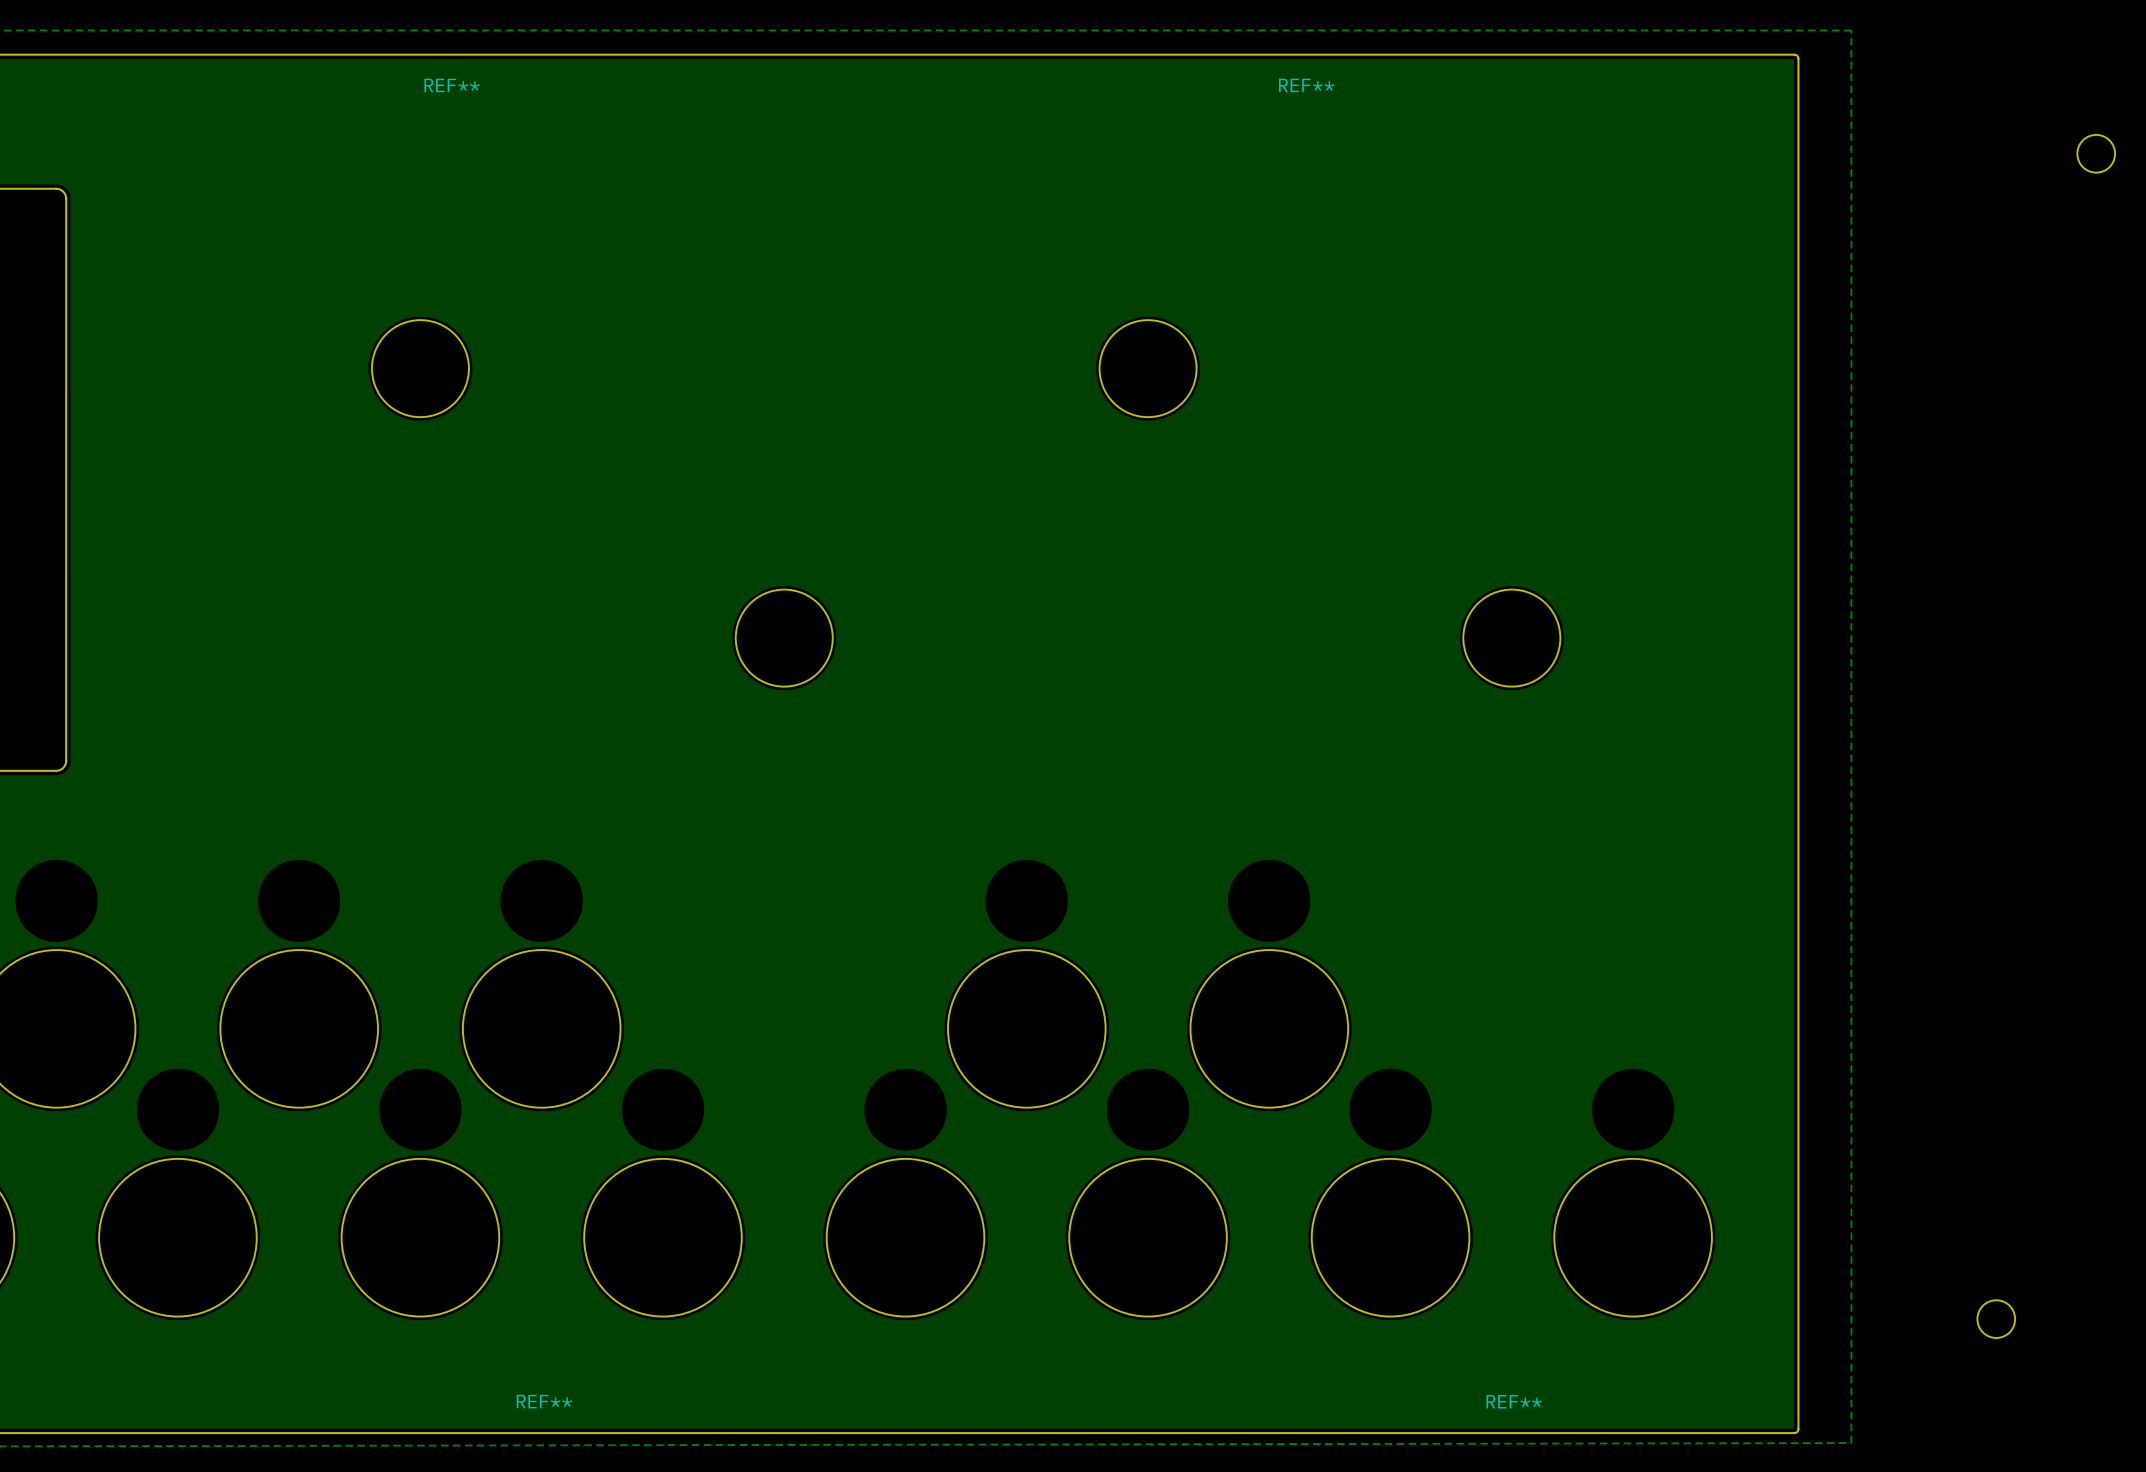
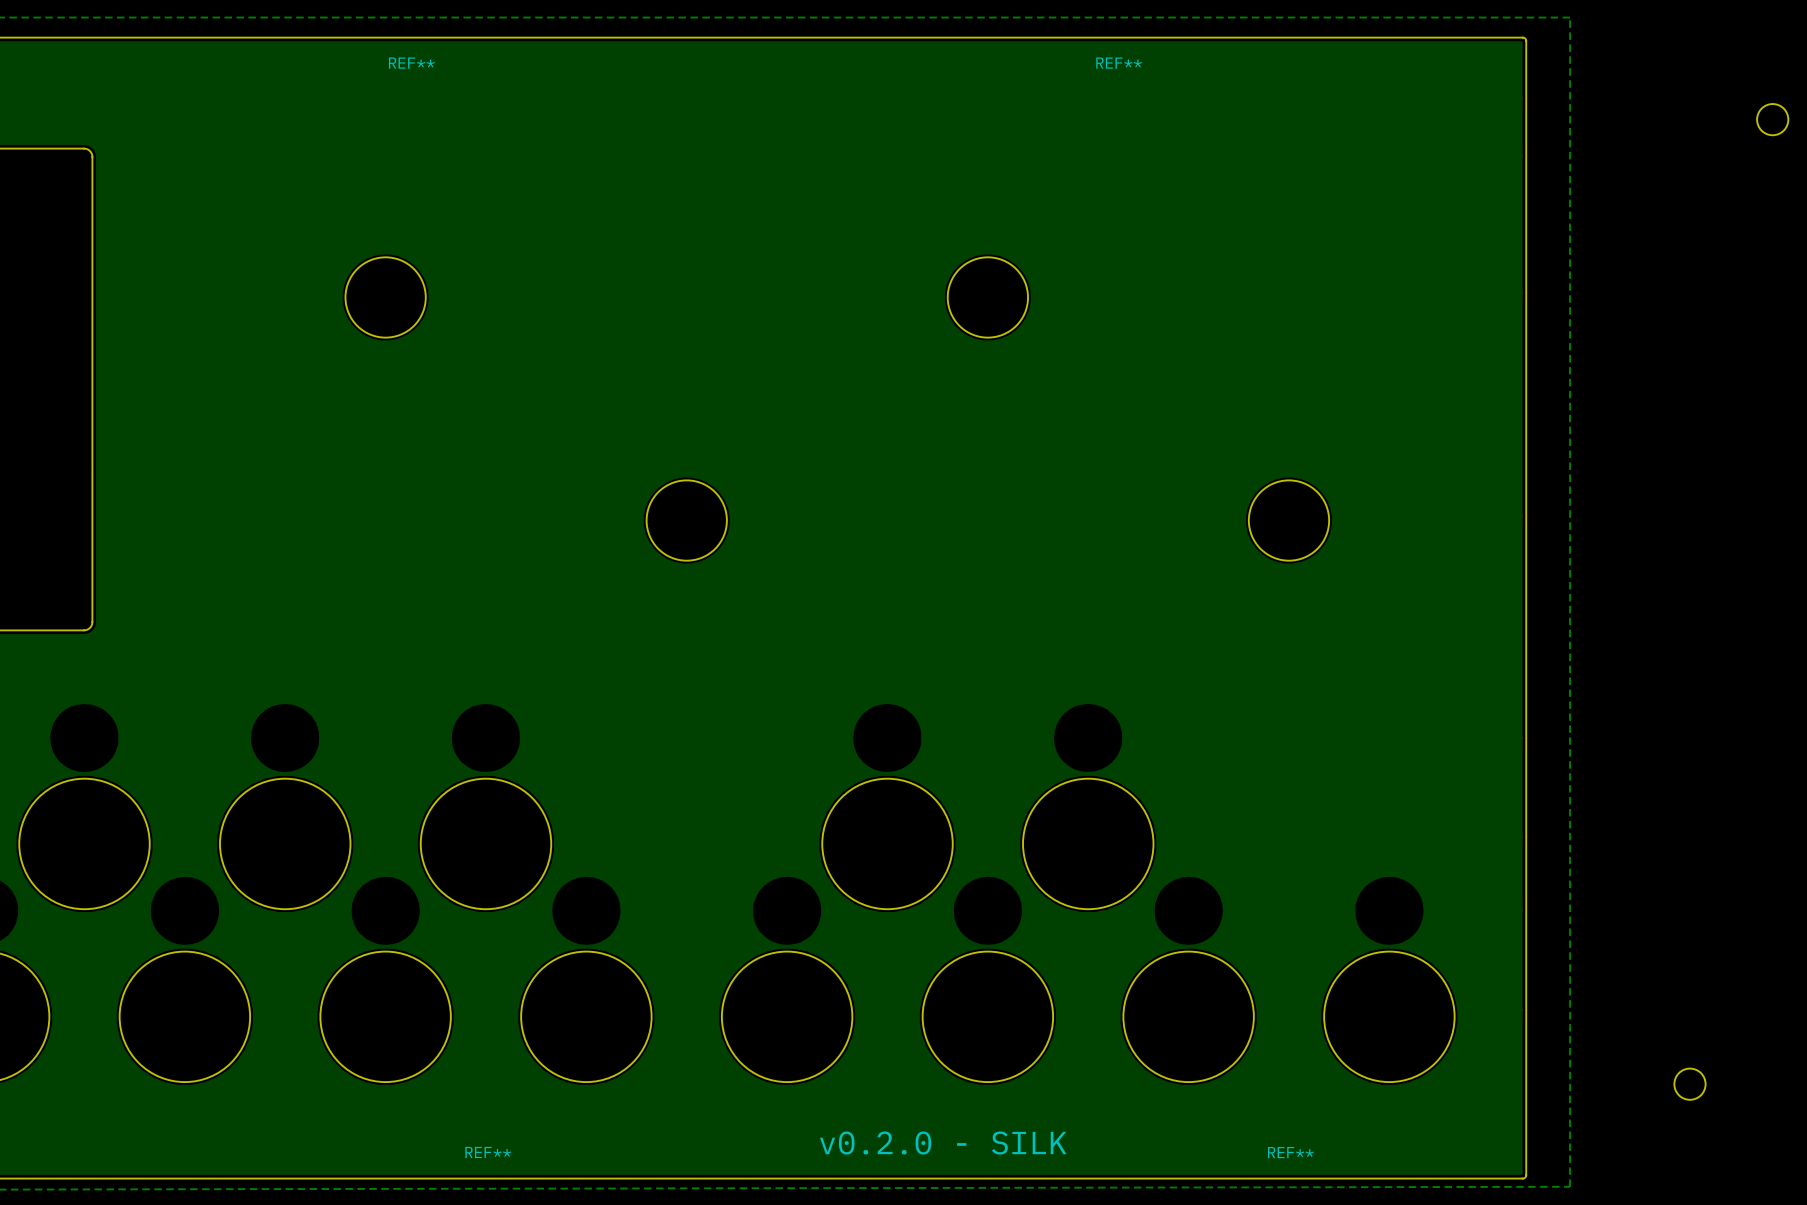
text: none -> v0.2.0 - SILK (943, 1143)

